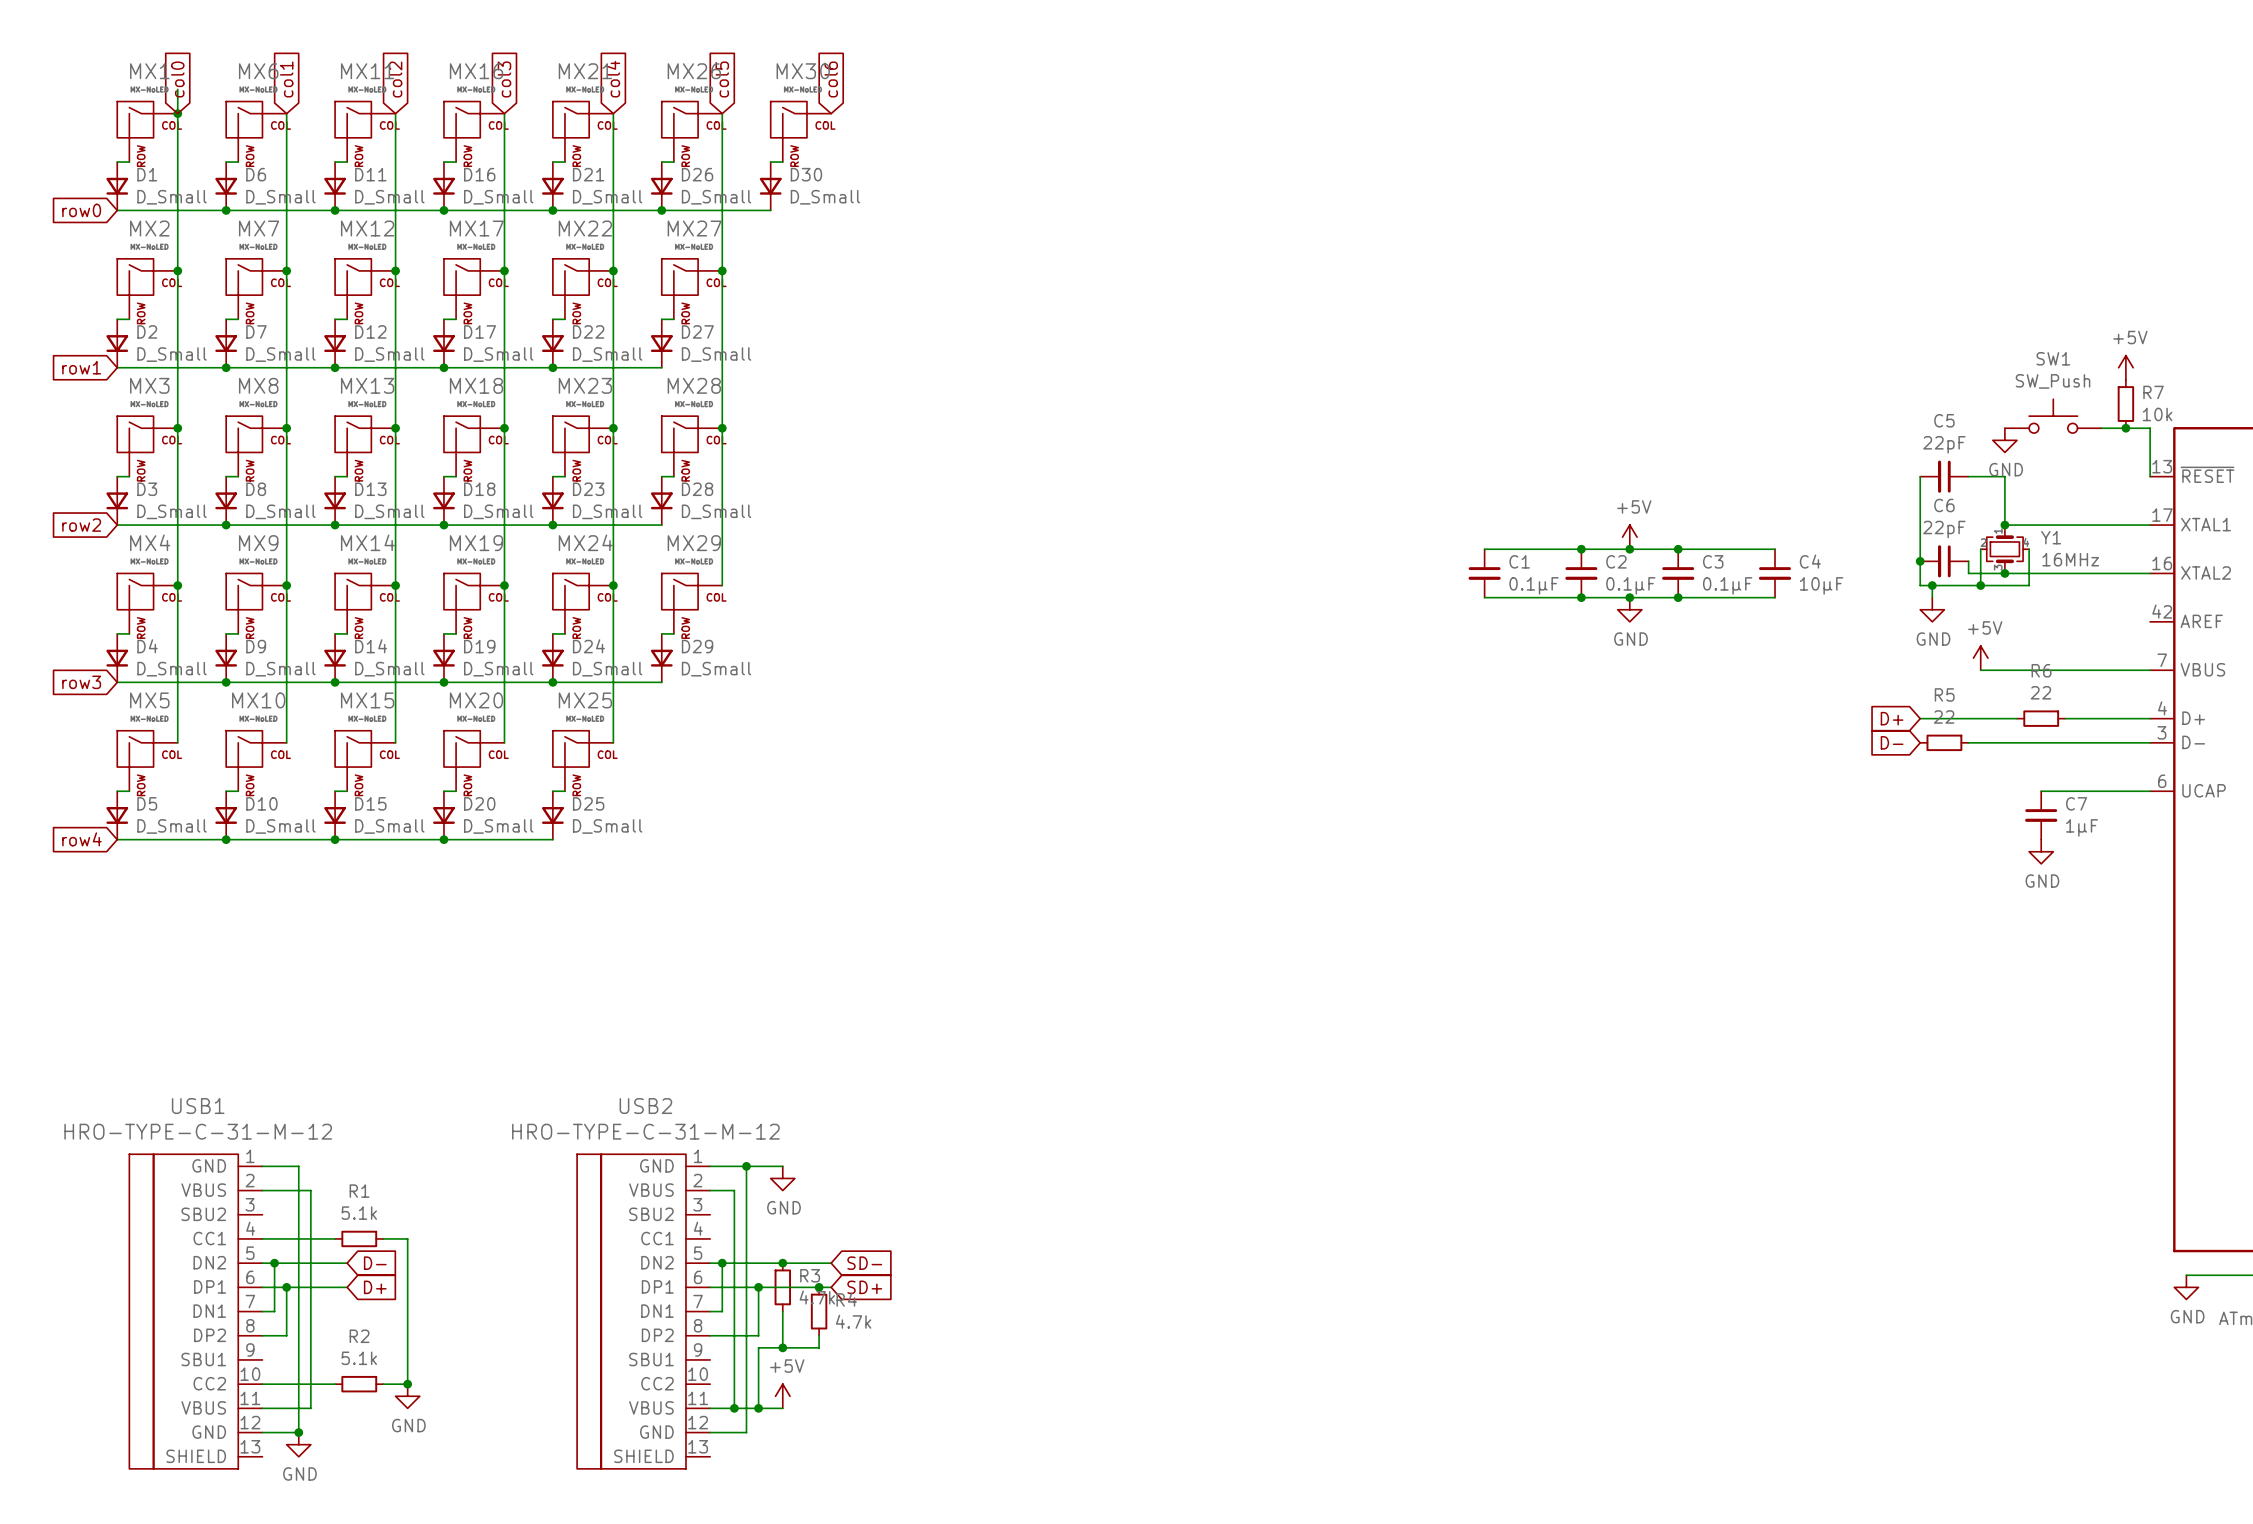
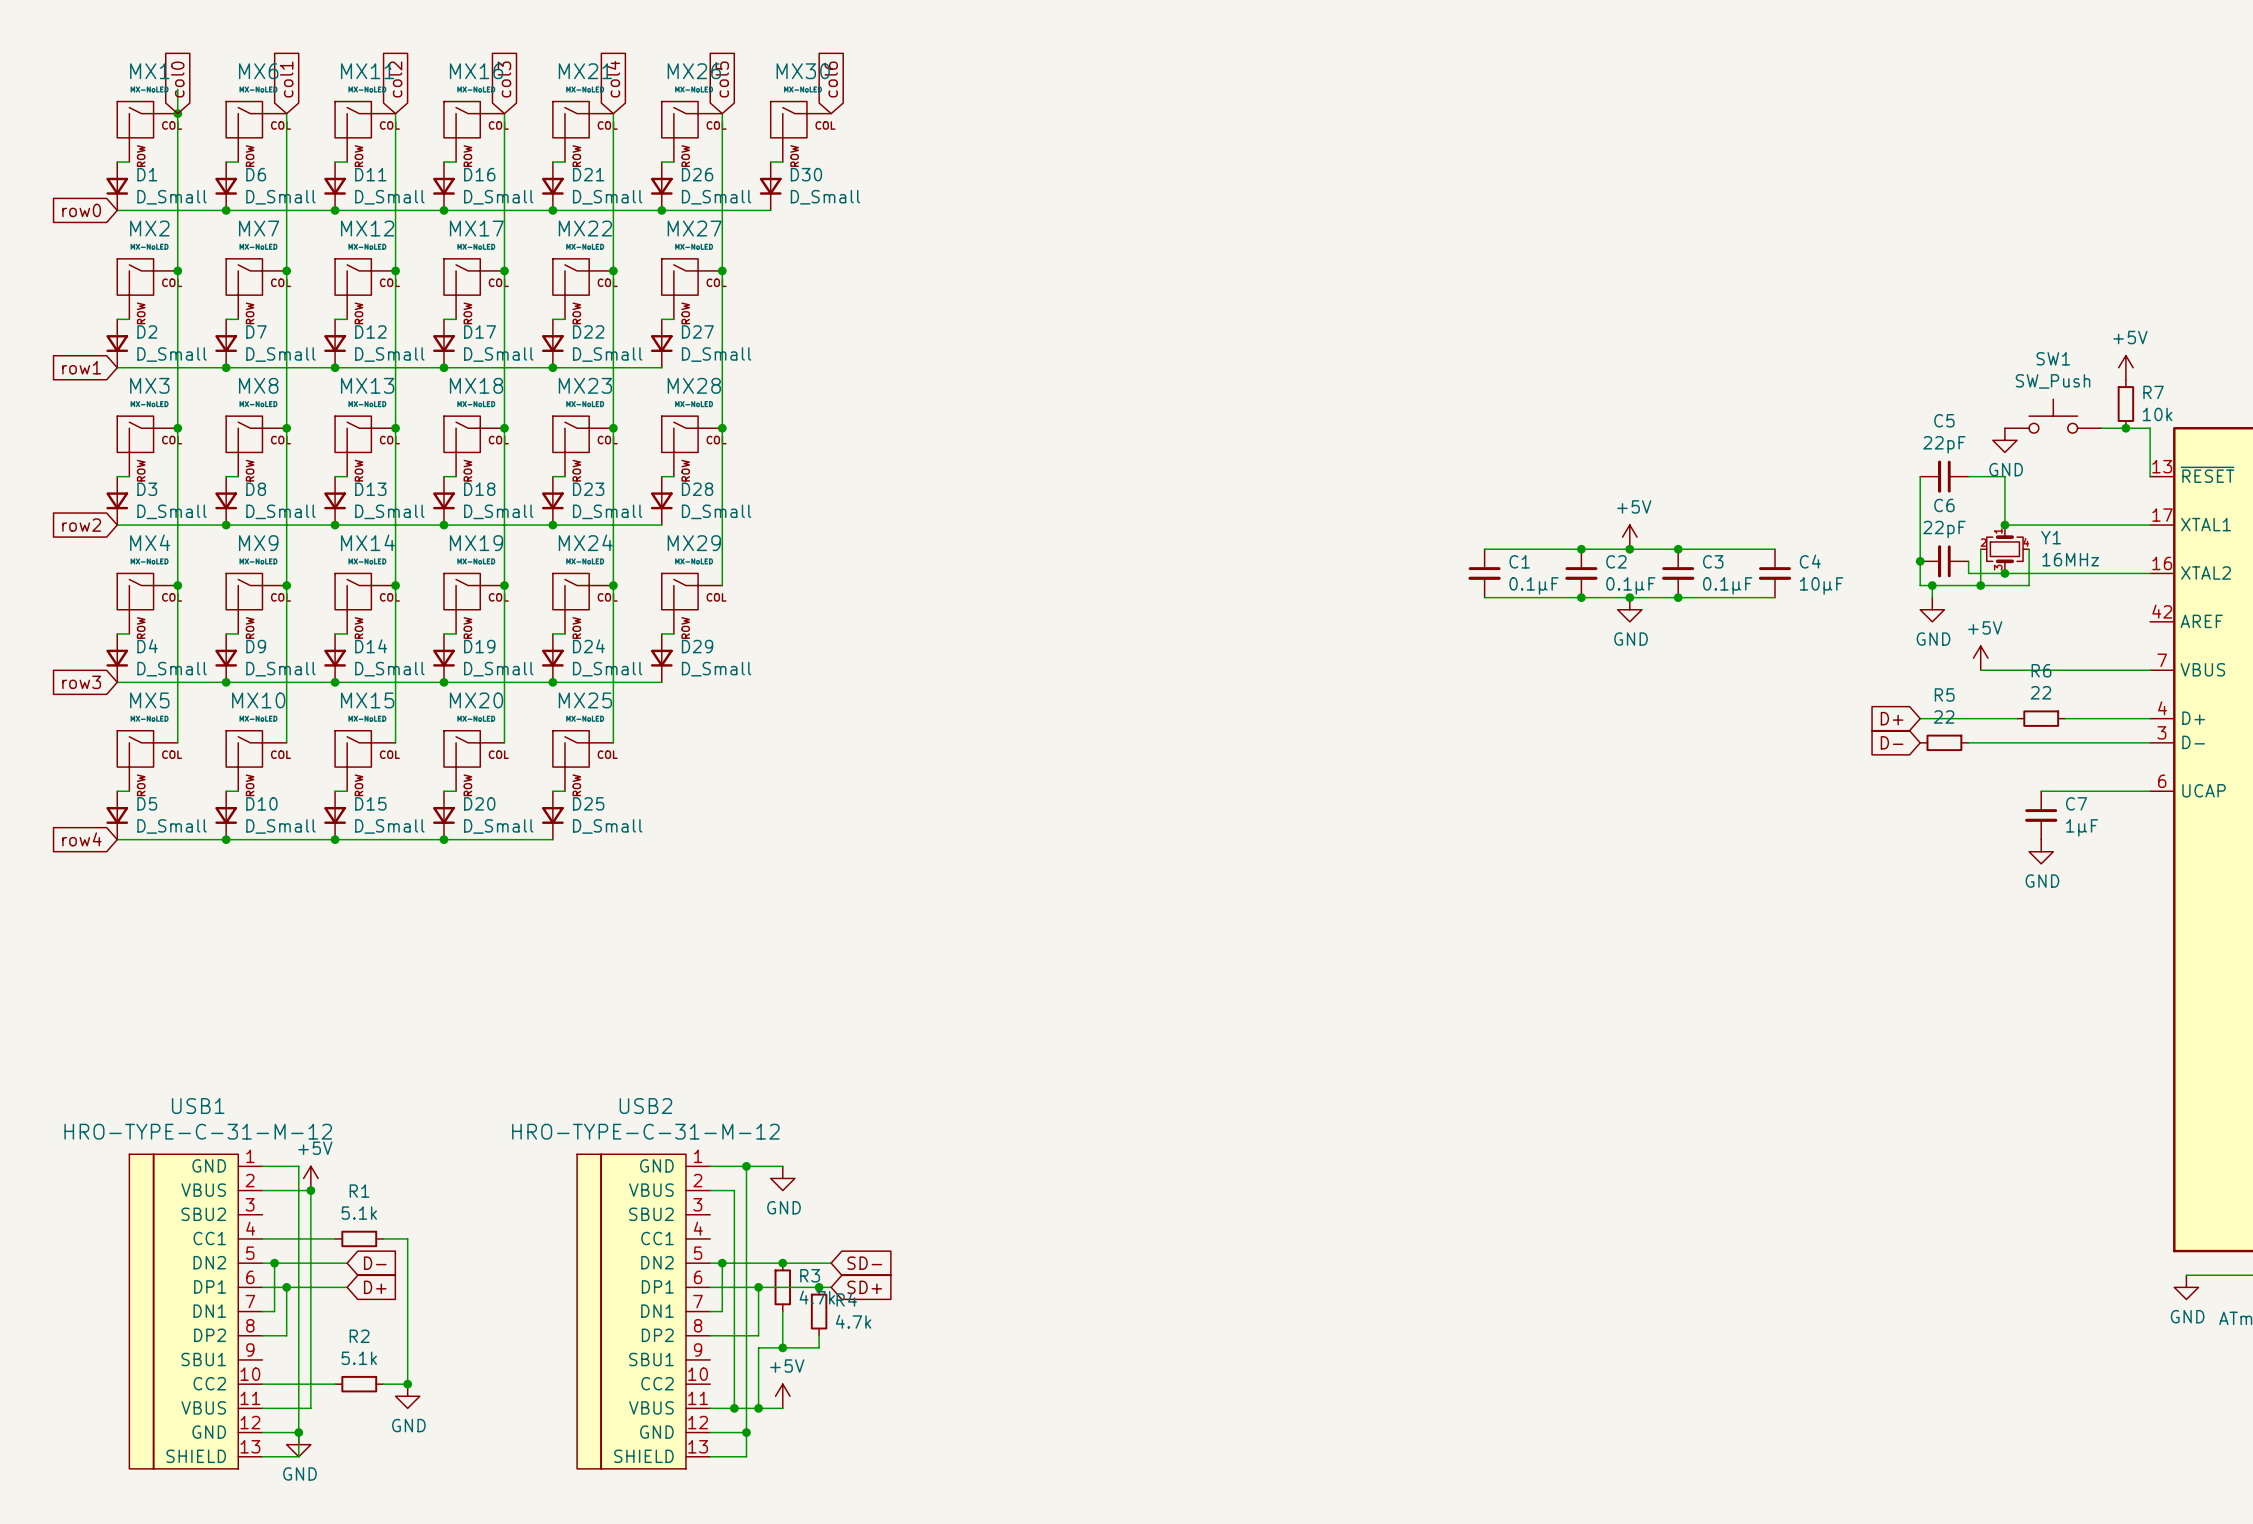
power symbol: none -> +5V (310, 1178)
junction: none -> (310, 1190)
wire: none -> (298, 1432) (298, 1456) (262, 1456)
wire: none -> (746, 1432) (746, 1456) (710, 1456)
junction: none -> (746, 1432)

